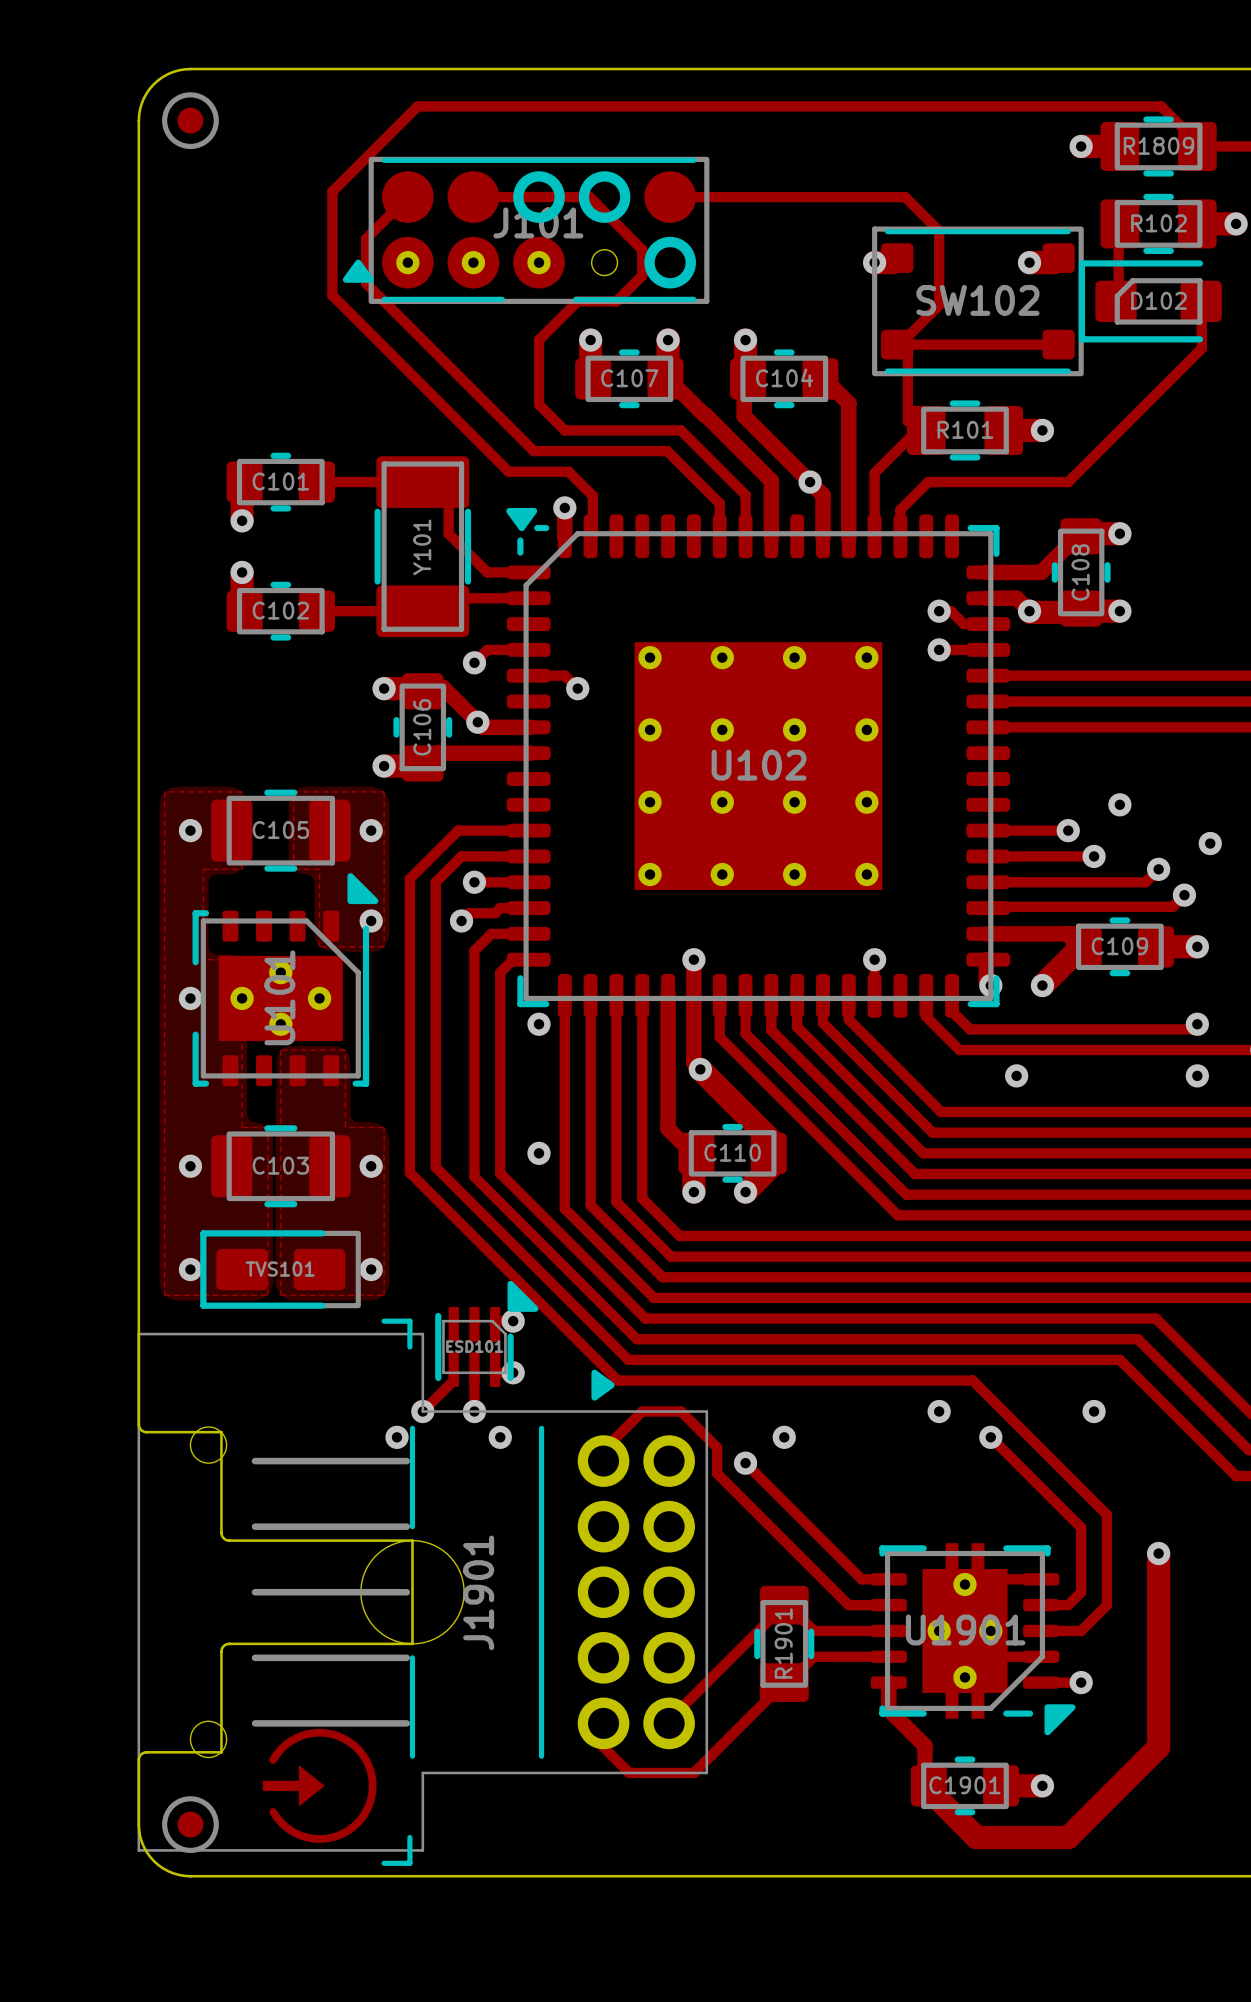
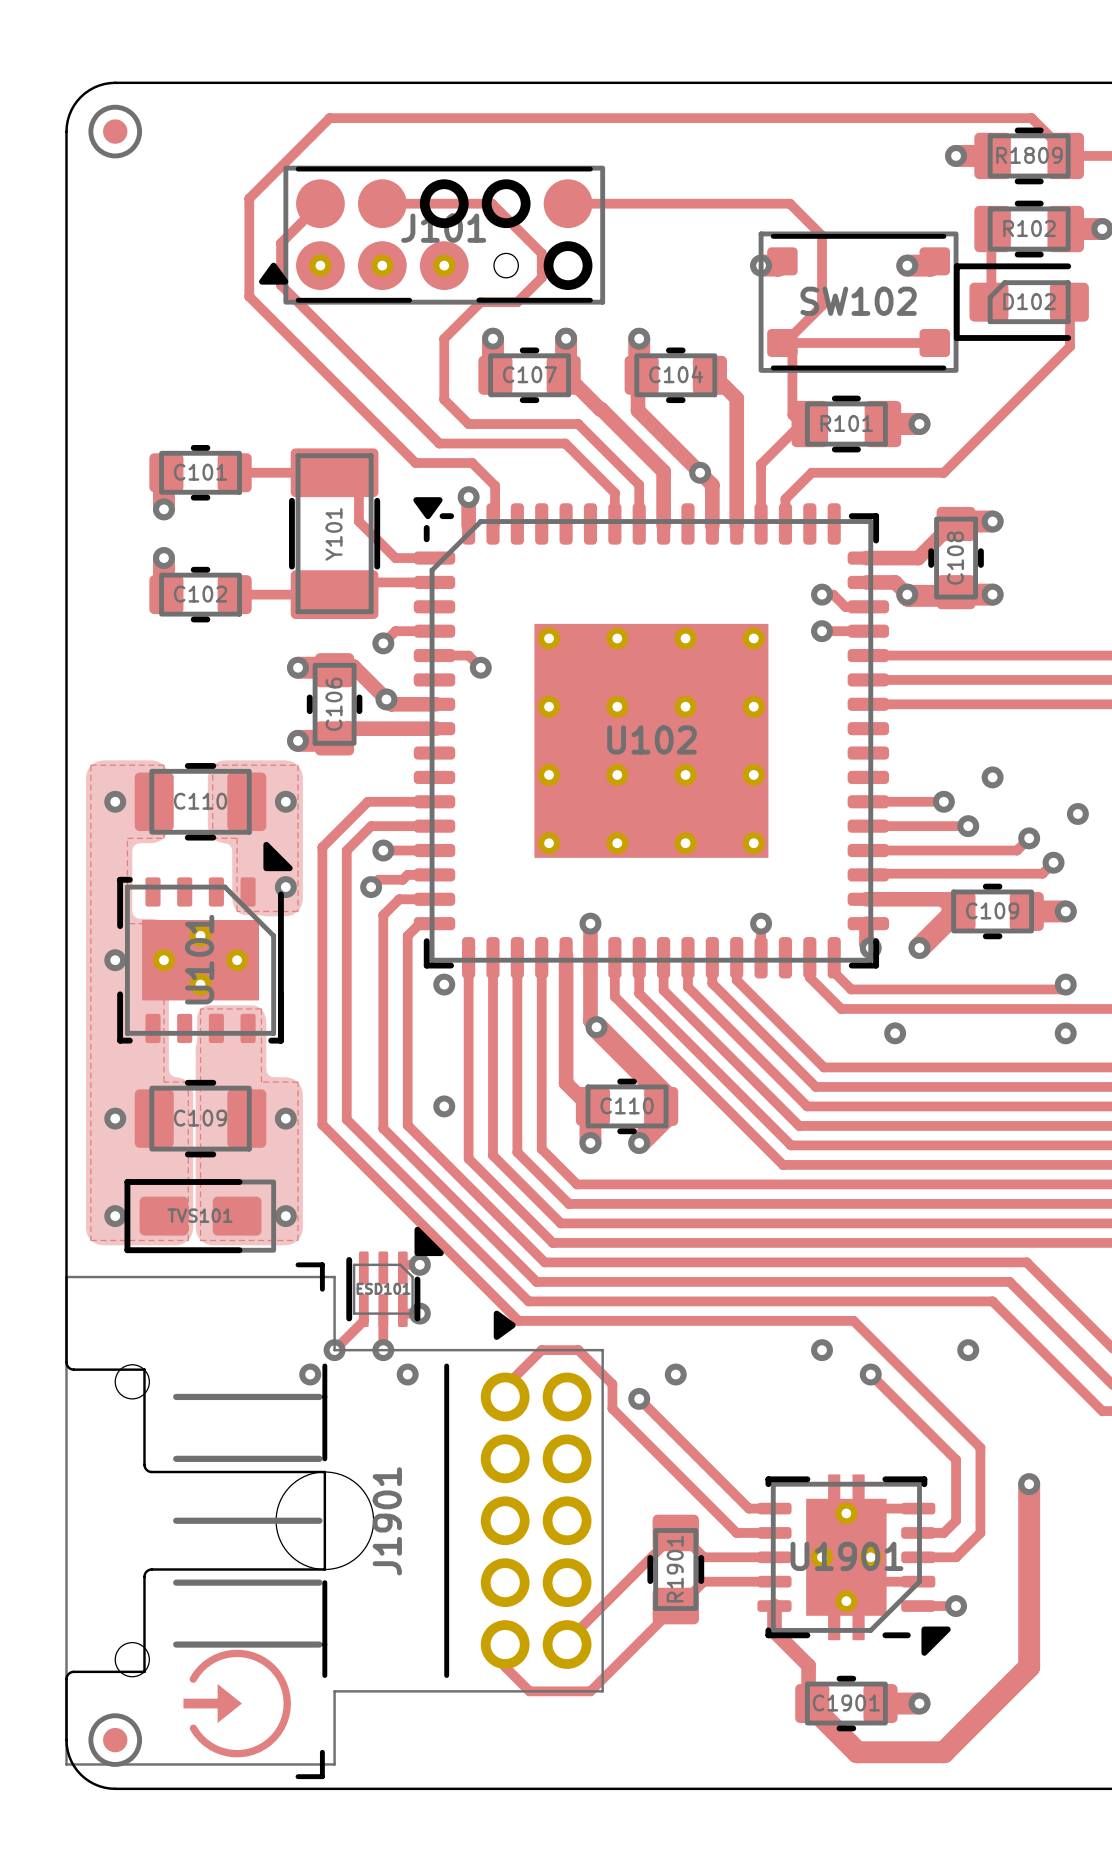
C105 name: C105 (280, 830) -> C110 (200, 801)
C103 name: C103 (280, 1165) -> C109 (200, 1118)

